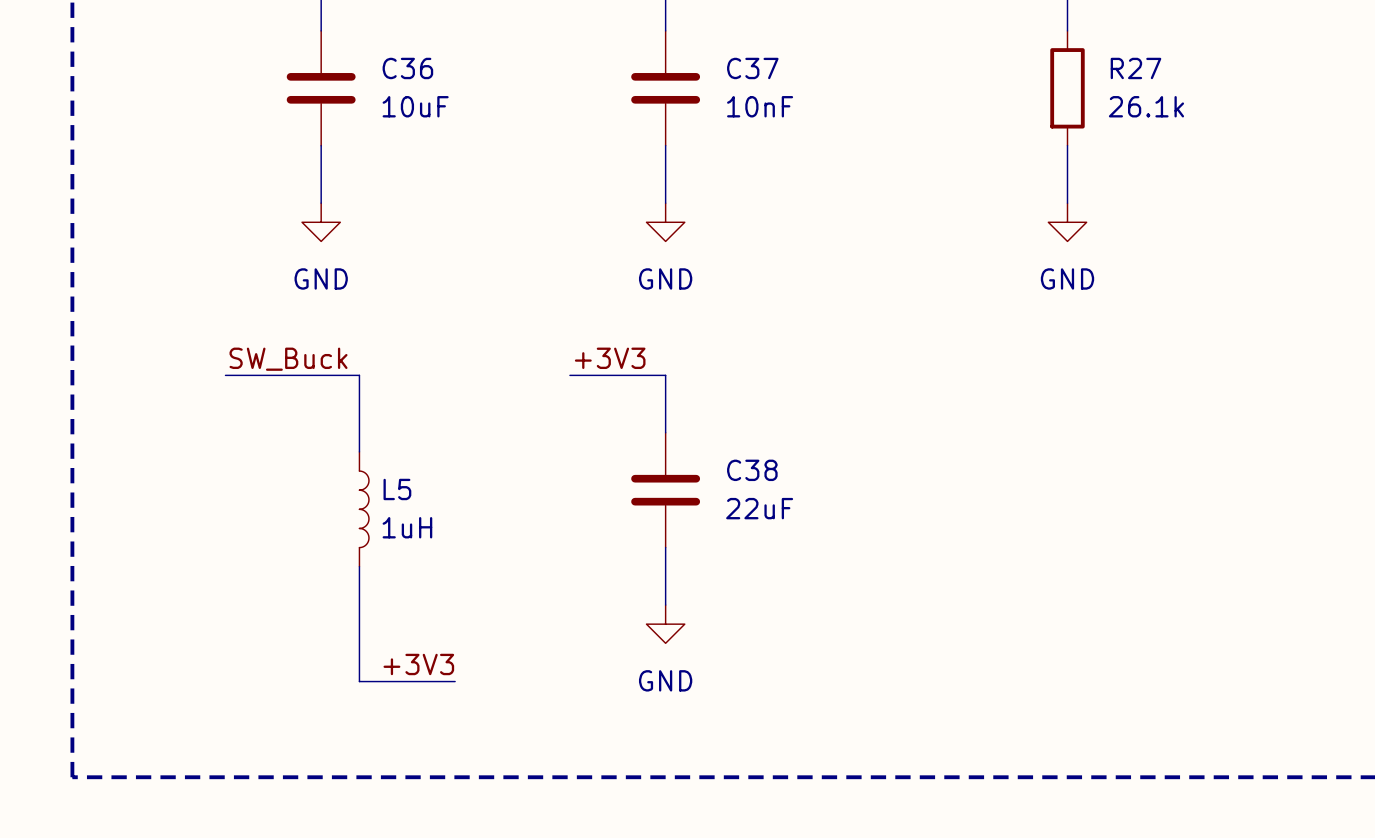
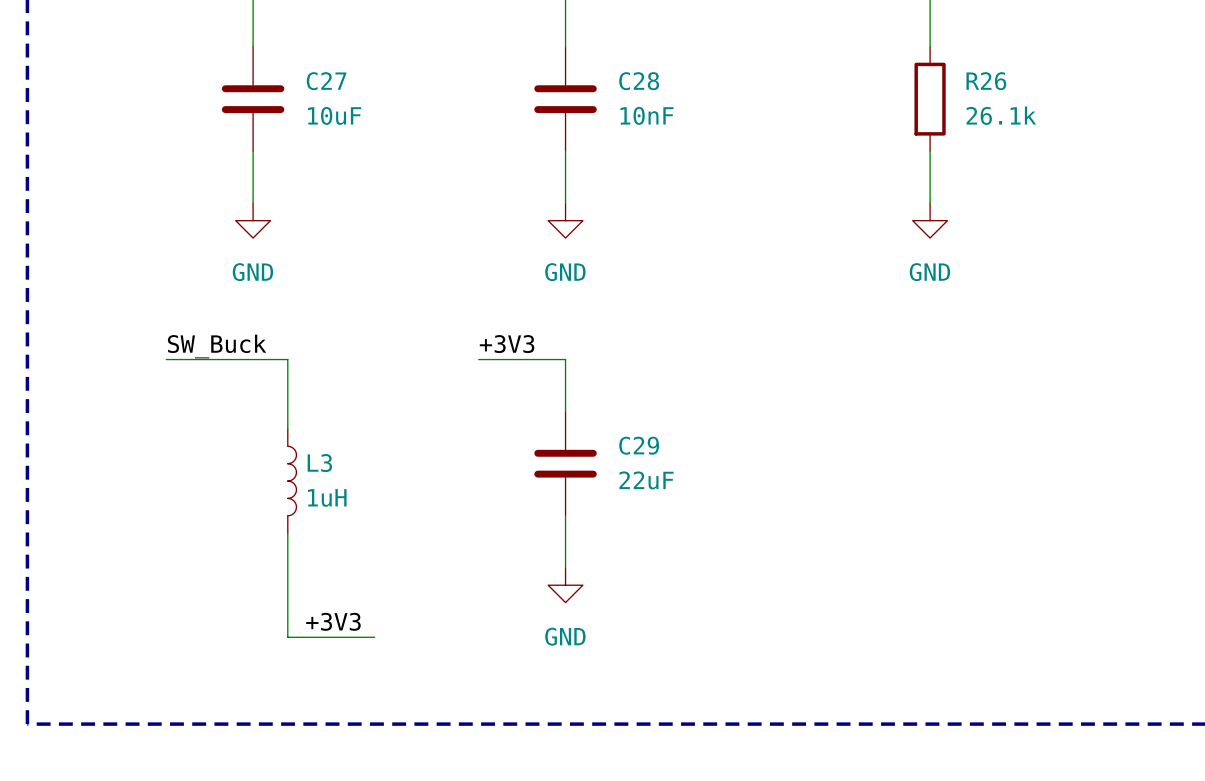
C36 name: C36 (407, 68) -> C27 (326, 81)
C37 name: C37 (752, 68) -> C28 (639, 81)
R27 name: R27 (1135, 68) -> R26 (986, 81)
C38 name: C38 (752, 470) -> C29 (639, 445)
L5 name: L5 (397, 489) -> L3 (319, 463)

